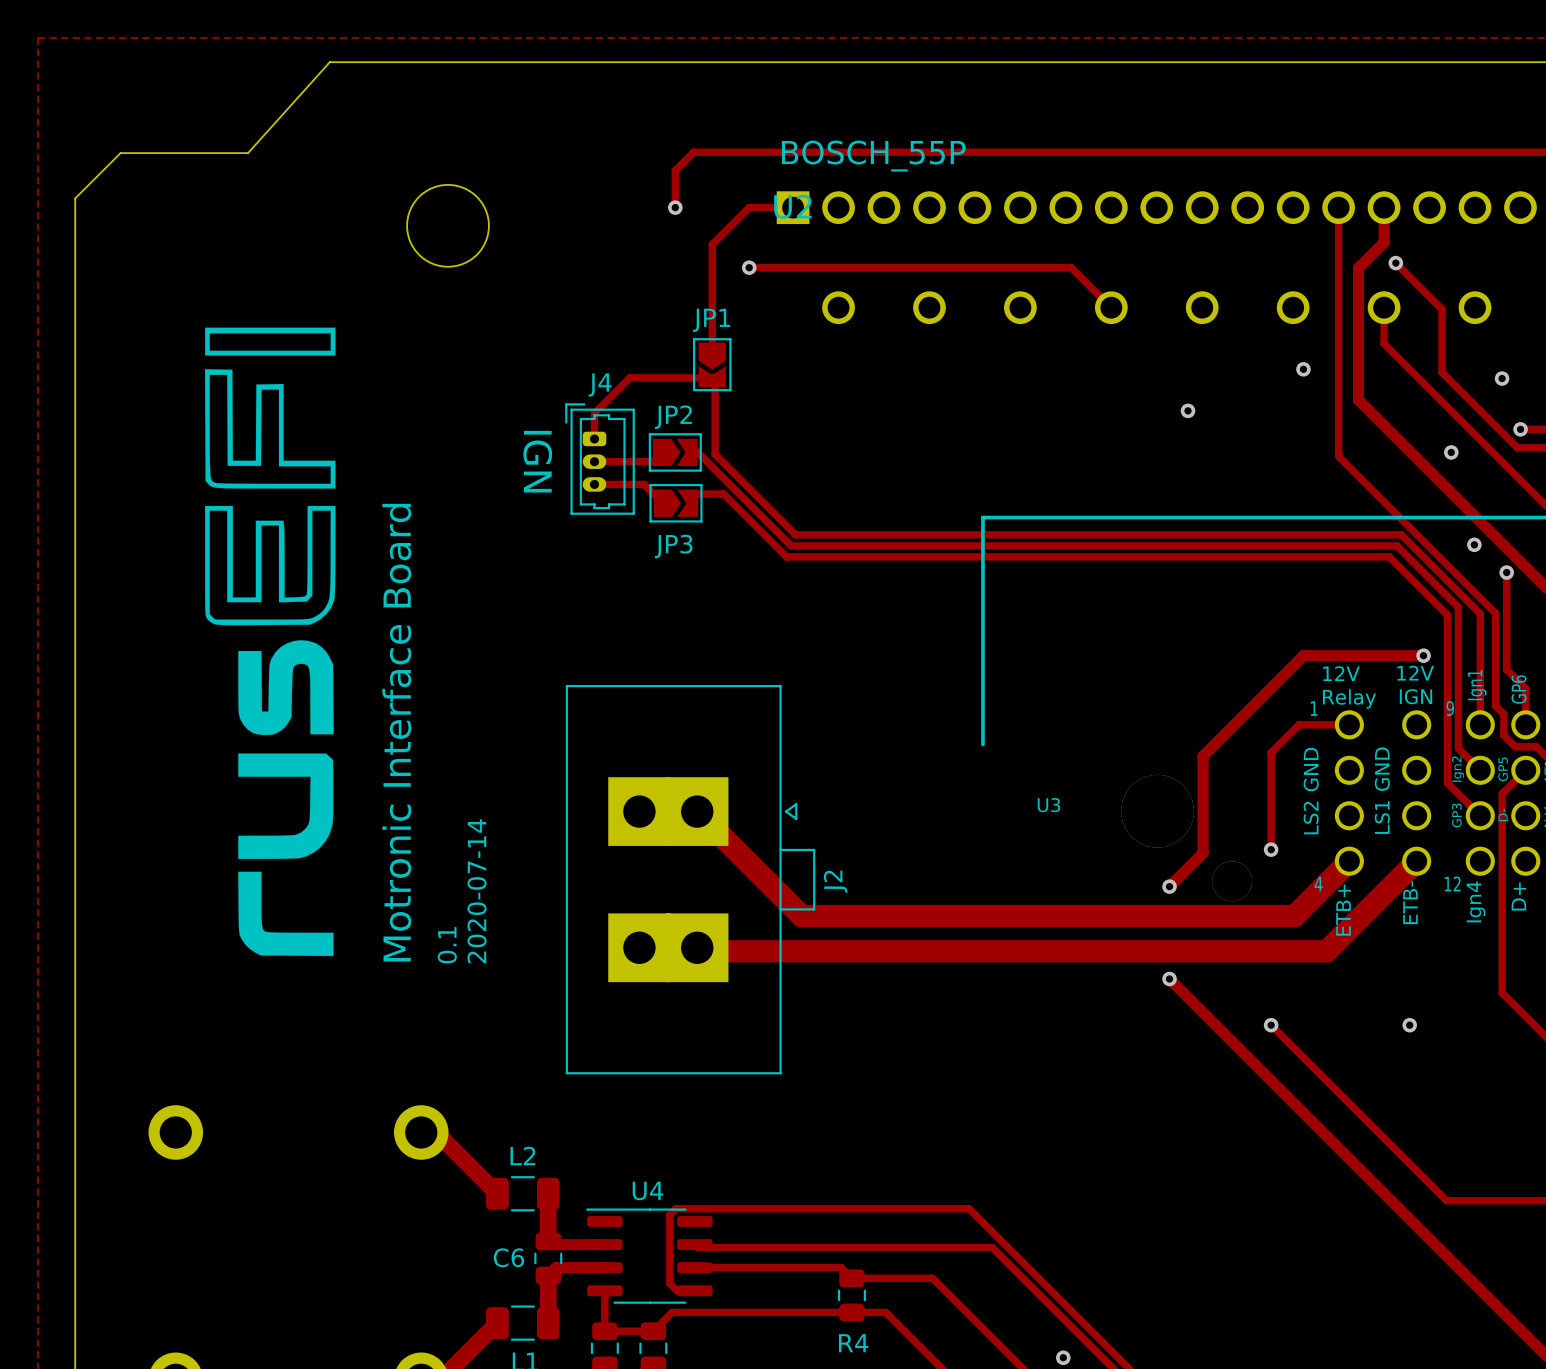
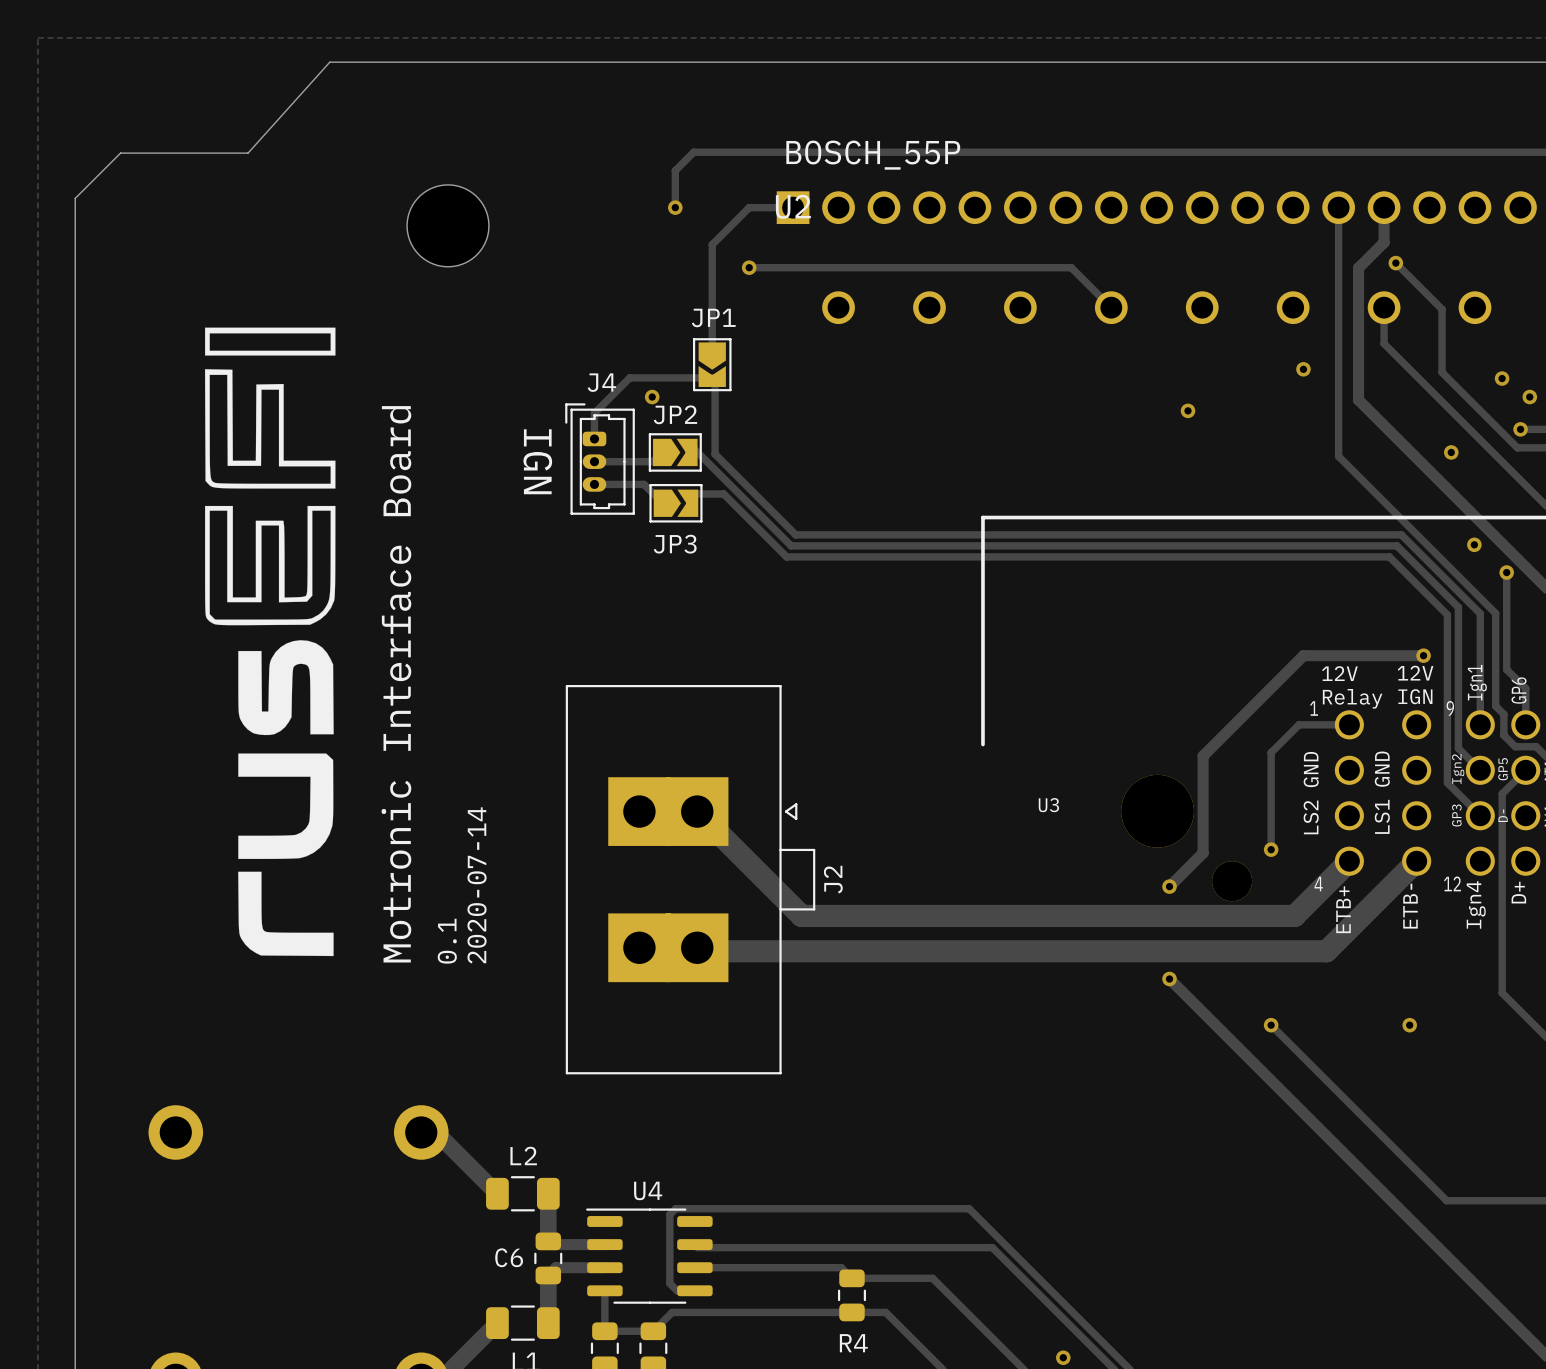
via: none -> (652, 397)
via: none -> (1529, 397)

